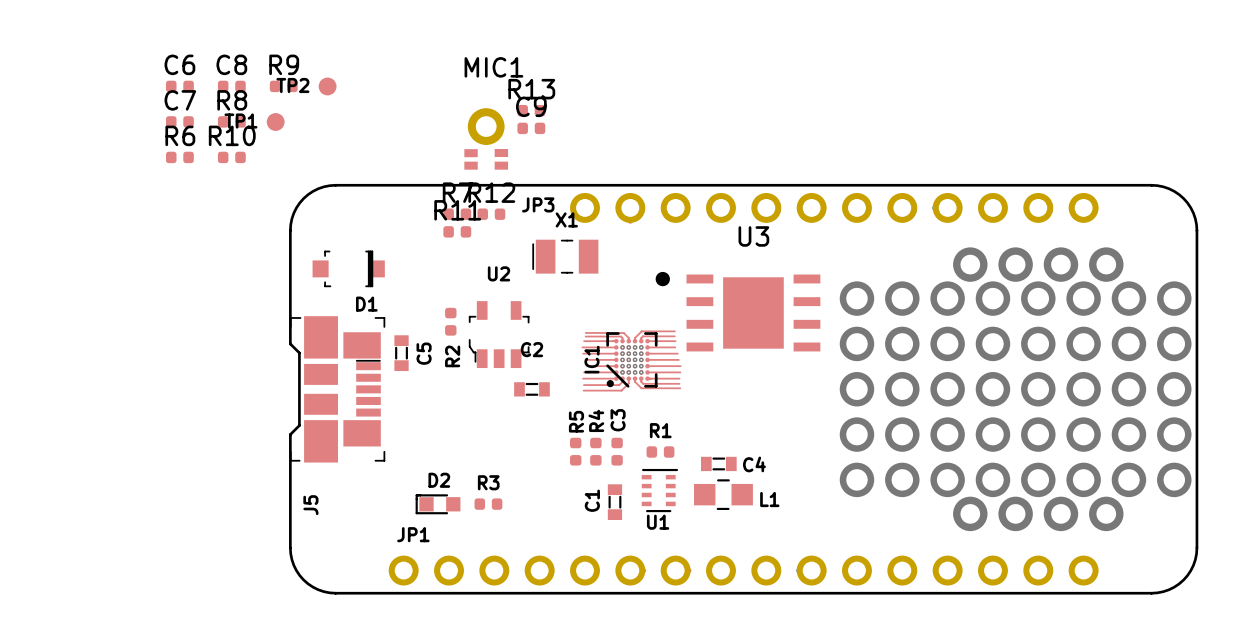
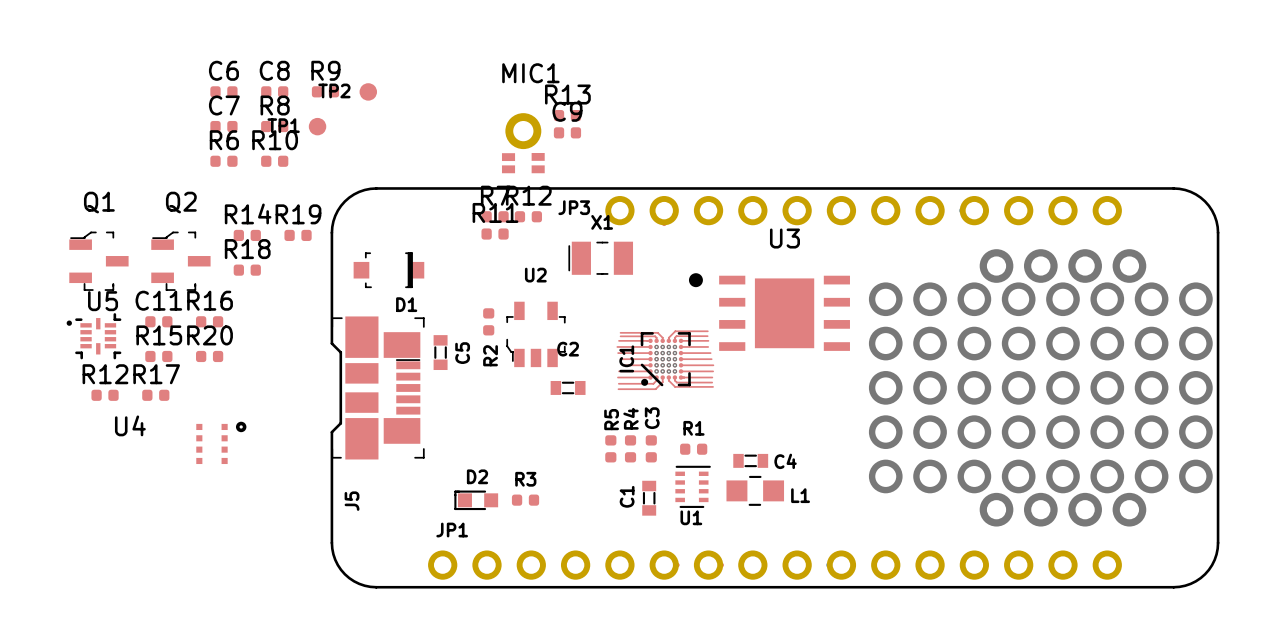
R14: none -> (247, 235)
R19: none -> (298, 235)
Q1: none -> (98, 261)
Q2: none -> (180, 261)
R18: none -> (247, 270)
C11: none -> (158, 321)
R16: none -> (209, 321)
U5: none -> (94, 336)
R15: none -> (158, 356)
R20: none -> (209, 356)
R12: none -> (105, 395)
R17: none -> (155, 395)
U4: none -> (221, 442)

